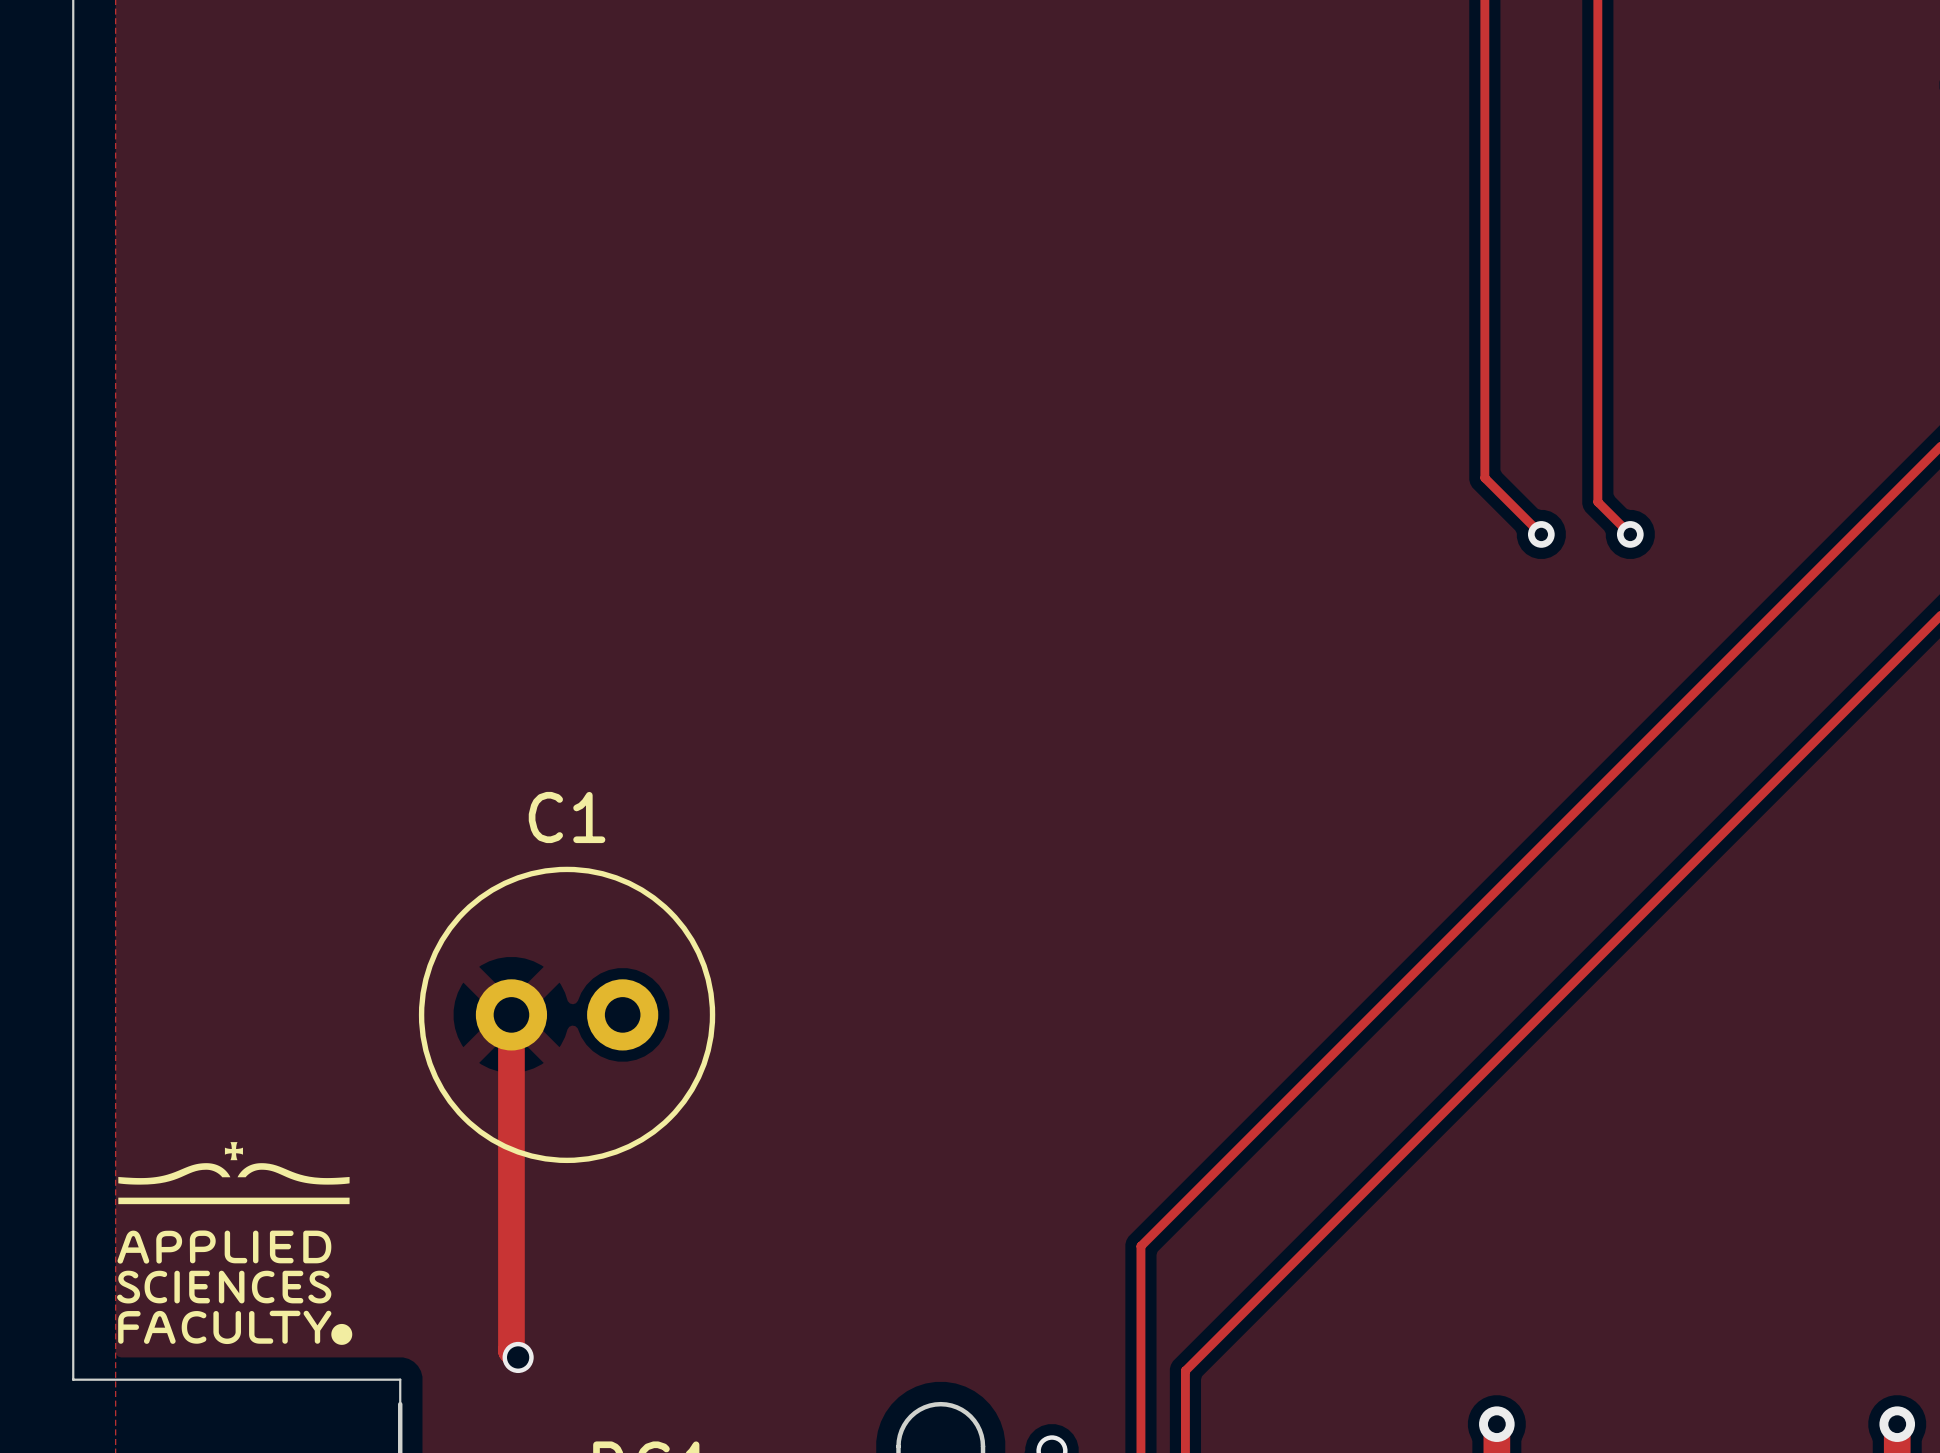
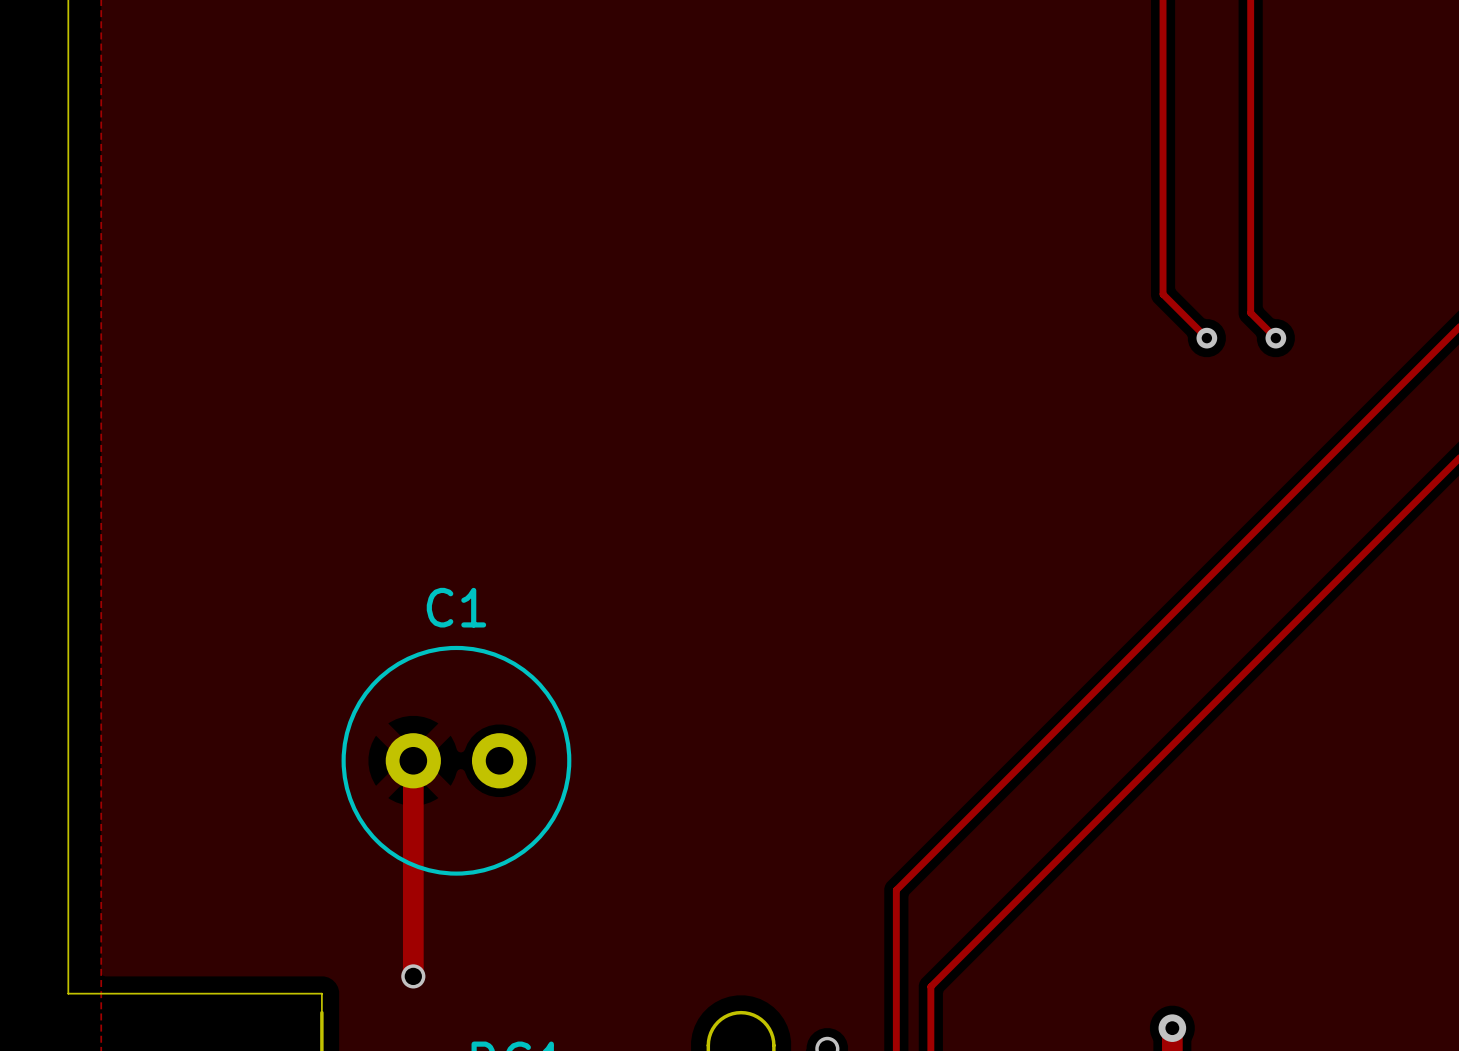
track: (511, 1014) (511, 1350) (518, 1357) -> (413, 760) (413, 976)
C1 position: (567, 1014) -> (456, 760)
drawing: [117, 1142, 353, 1345] -> none

